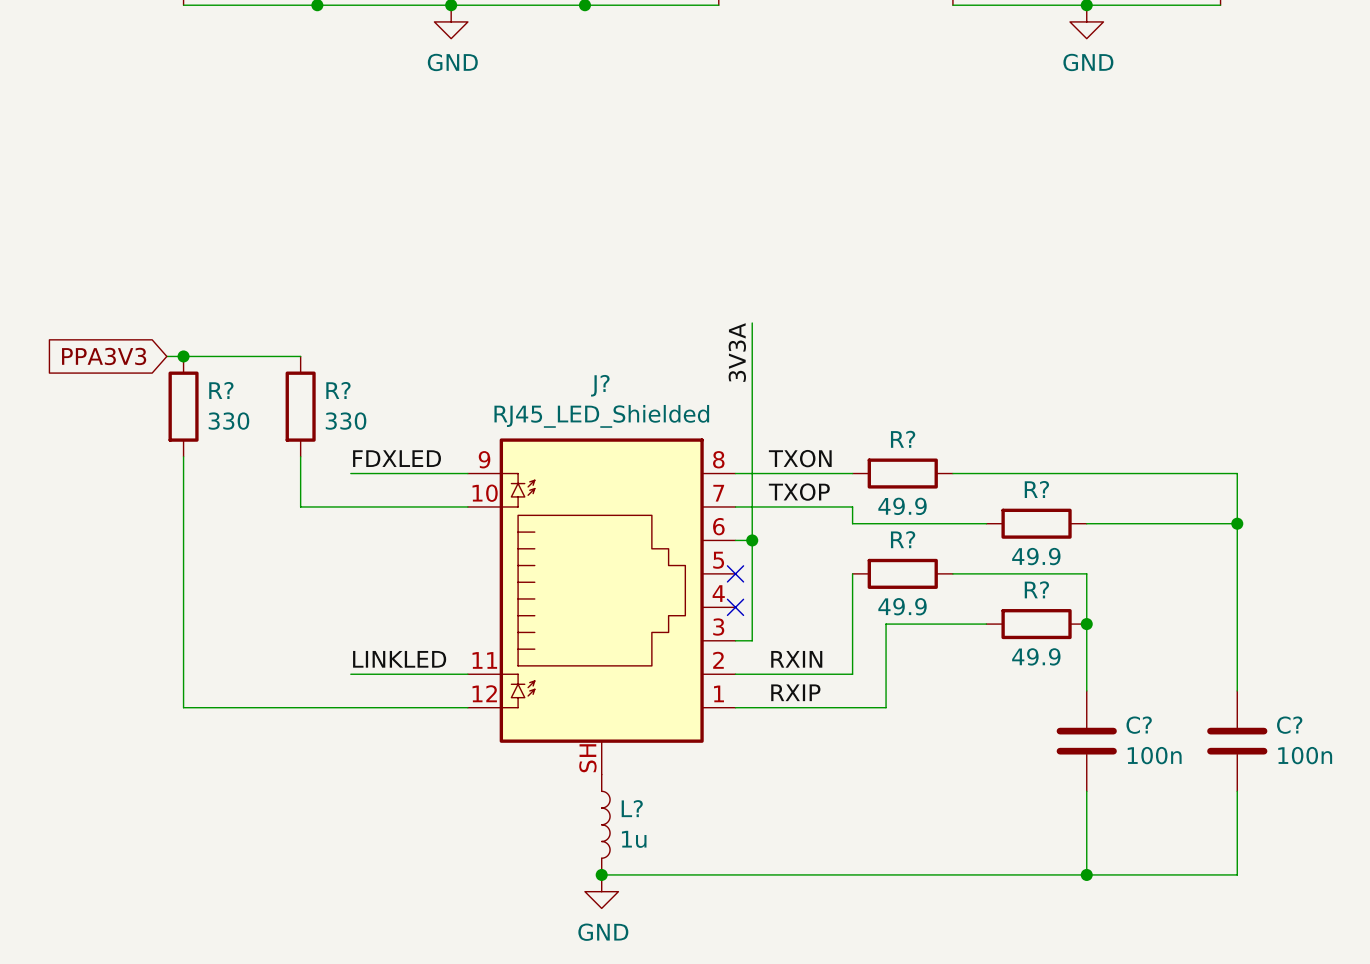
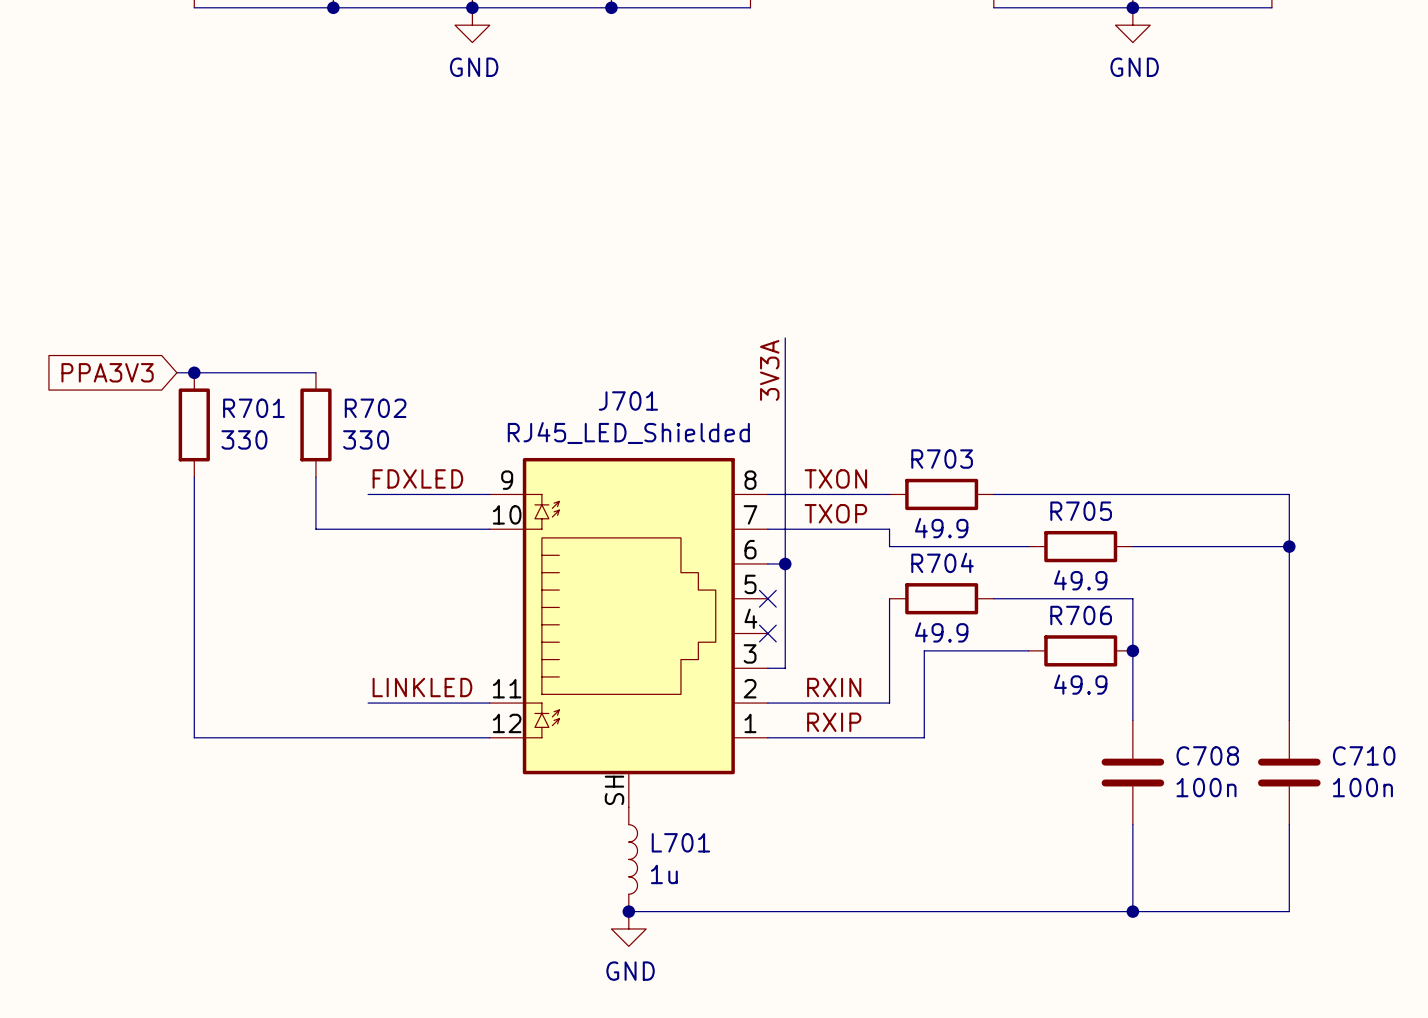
J? name: J? (600, 385) -> J701 (628, 401)
R? name: R? (221, 390) -> R701 (253, 408)
R? name: R? (338, 390) -> R702 (375, 408)
R? name: R? (903, 439) -> R703 (942, 459)
R? name: R? (1036, 489) -> R705 (1081, 511)
R? name: R? (903, 539) -> R704 (942, 562)
R? name: R? (1036, 589) -> R706 (1081, 615)
C? name: C? (1139, 725) -> C708 (1207, 755)
C? name: C? (1289, 725) -> C710 (1364, 755)
L? name: L? (632, 808) -> L701 (680, 842)

